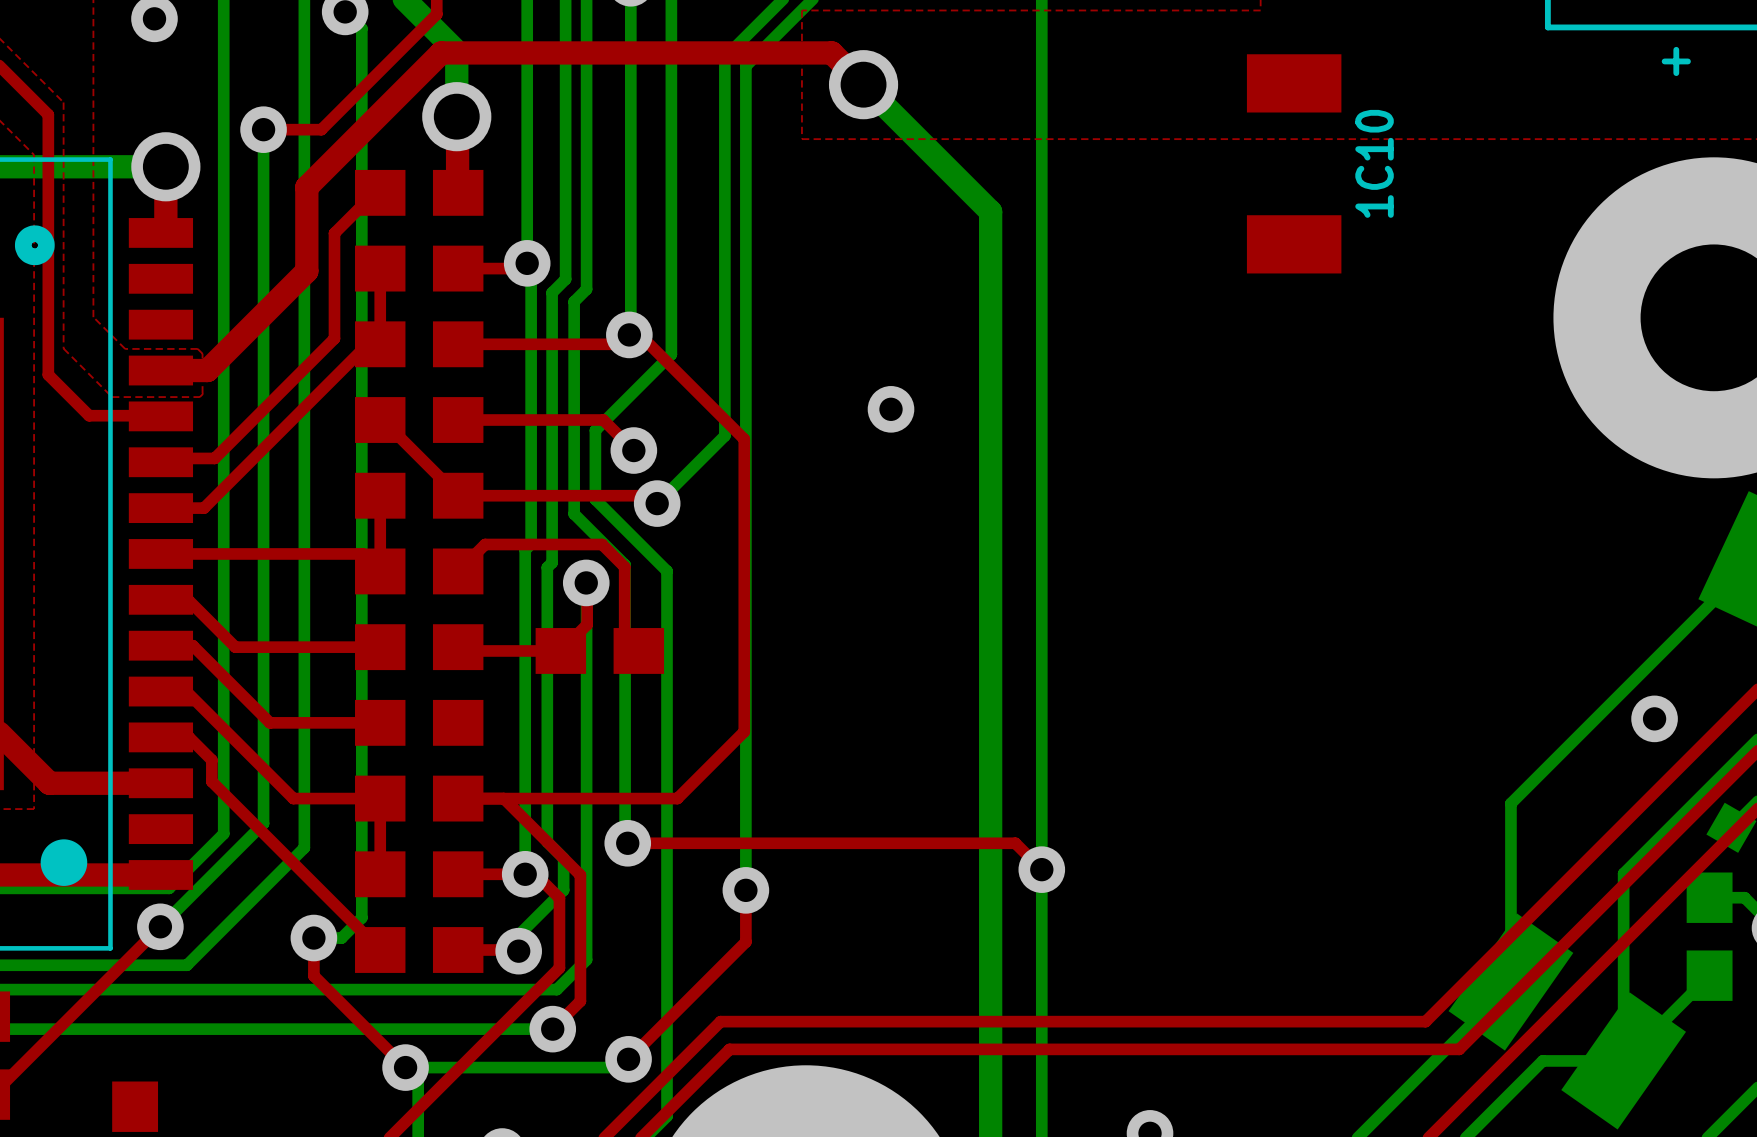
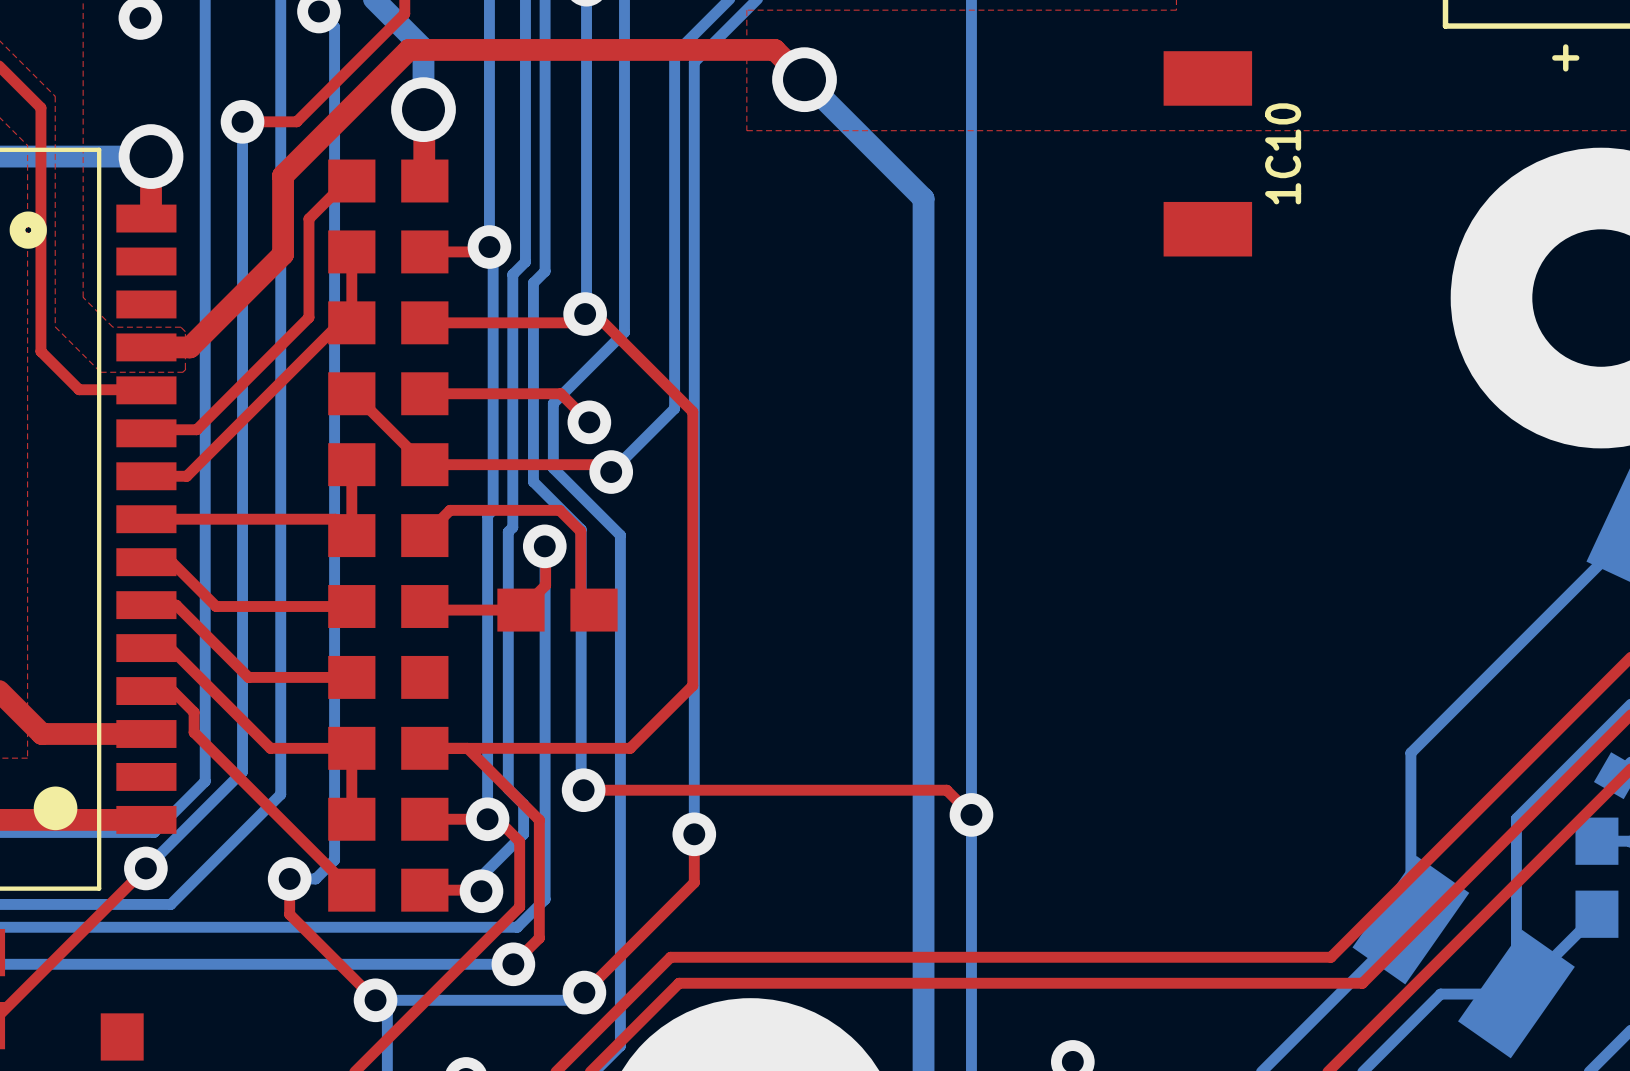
via: (891, 409) -> none
via: (1654, 718) -> none

